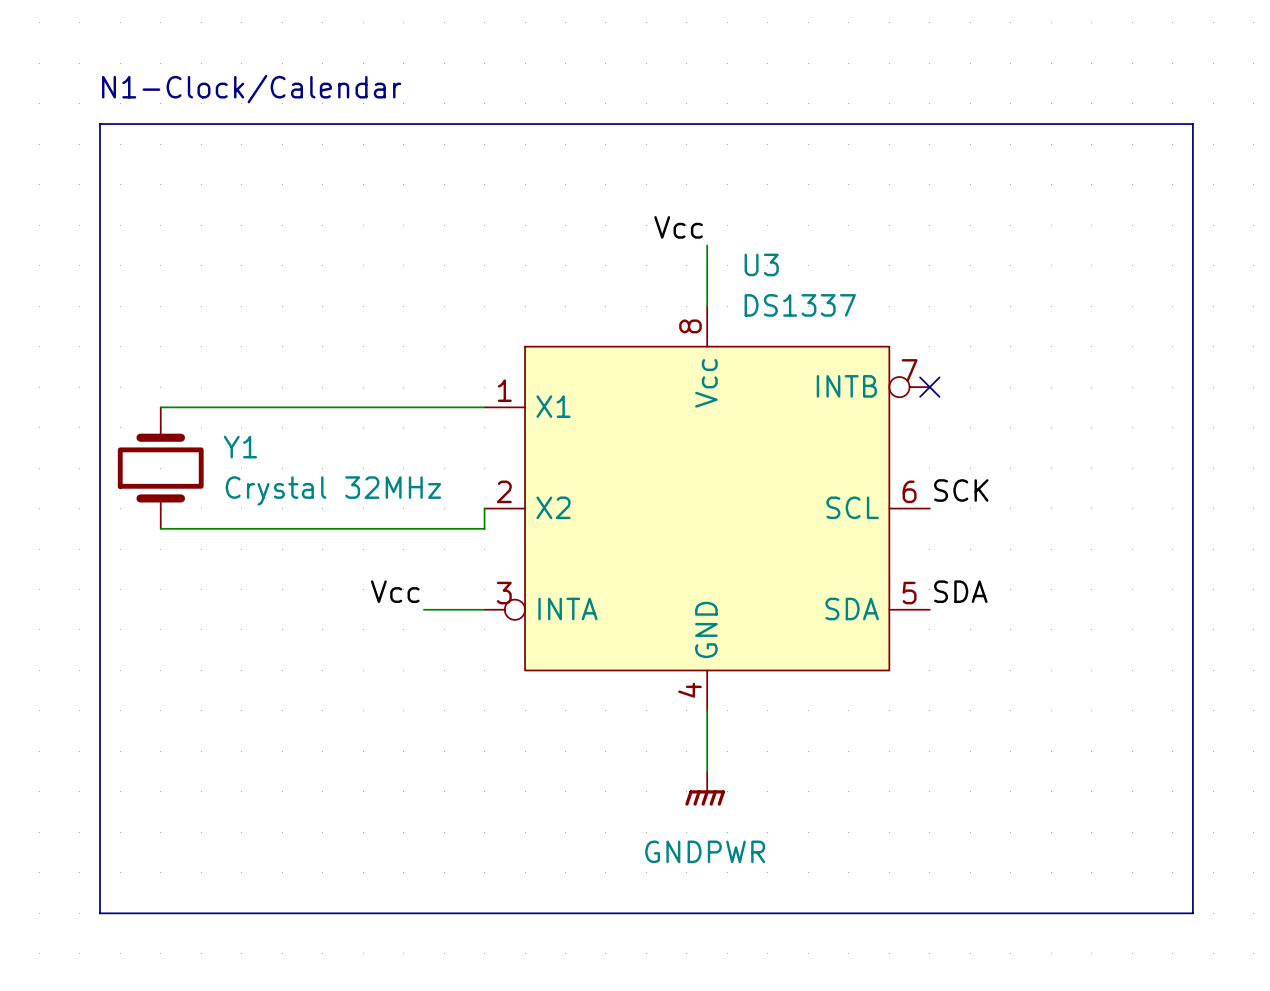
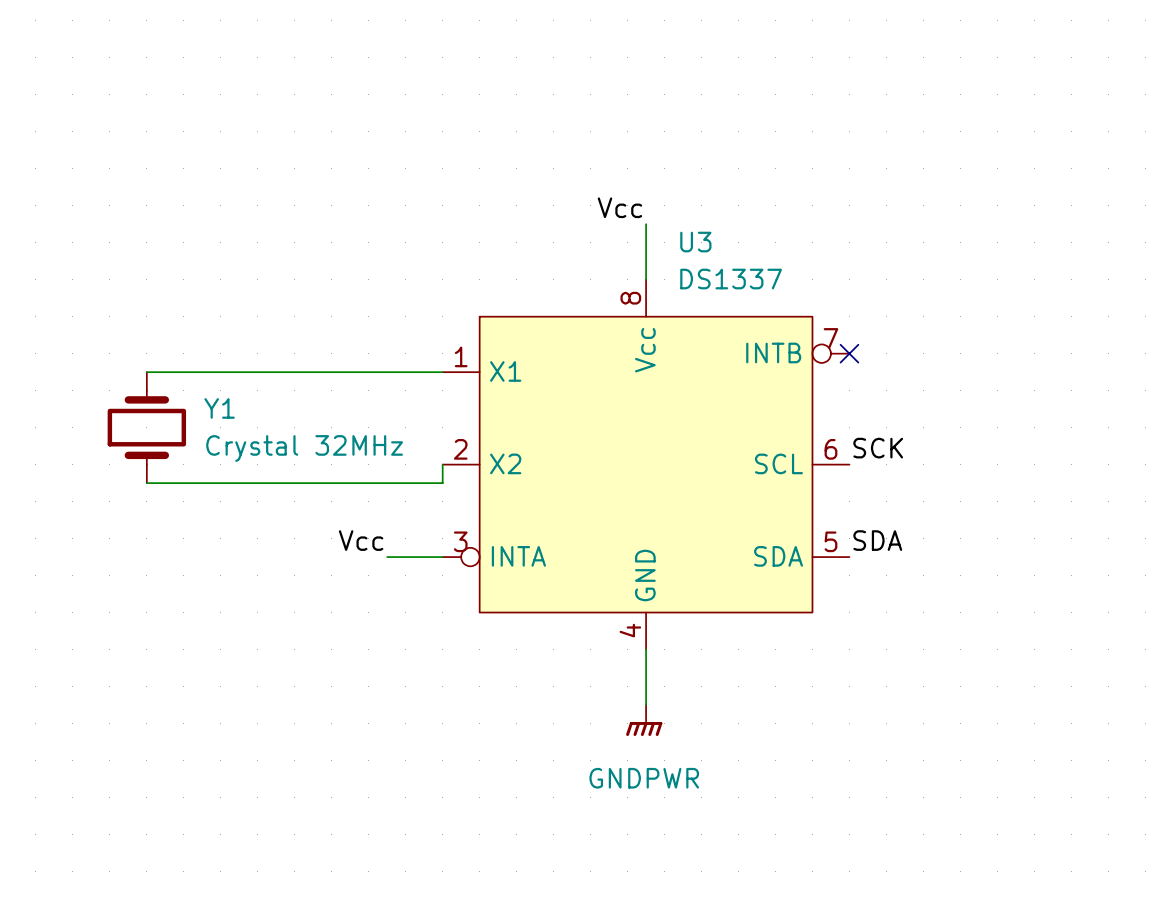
text: N1-Clock/Calendar (251, 89) -> none
line: (100, 124) (100, 913) (1192, 913) (1192, 124) (100, 124) -> none

